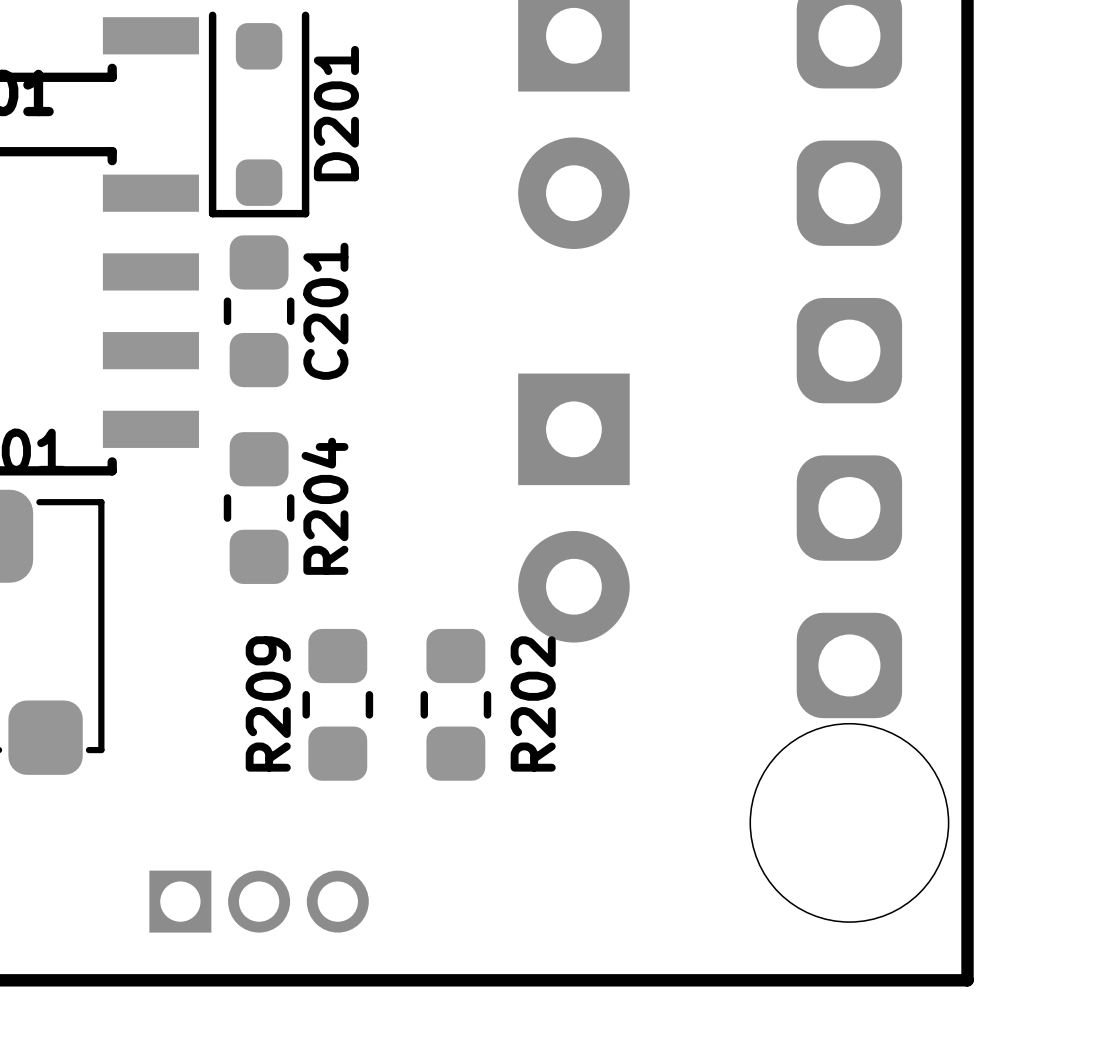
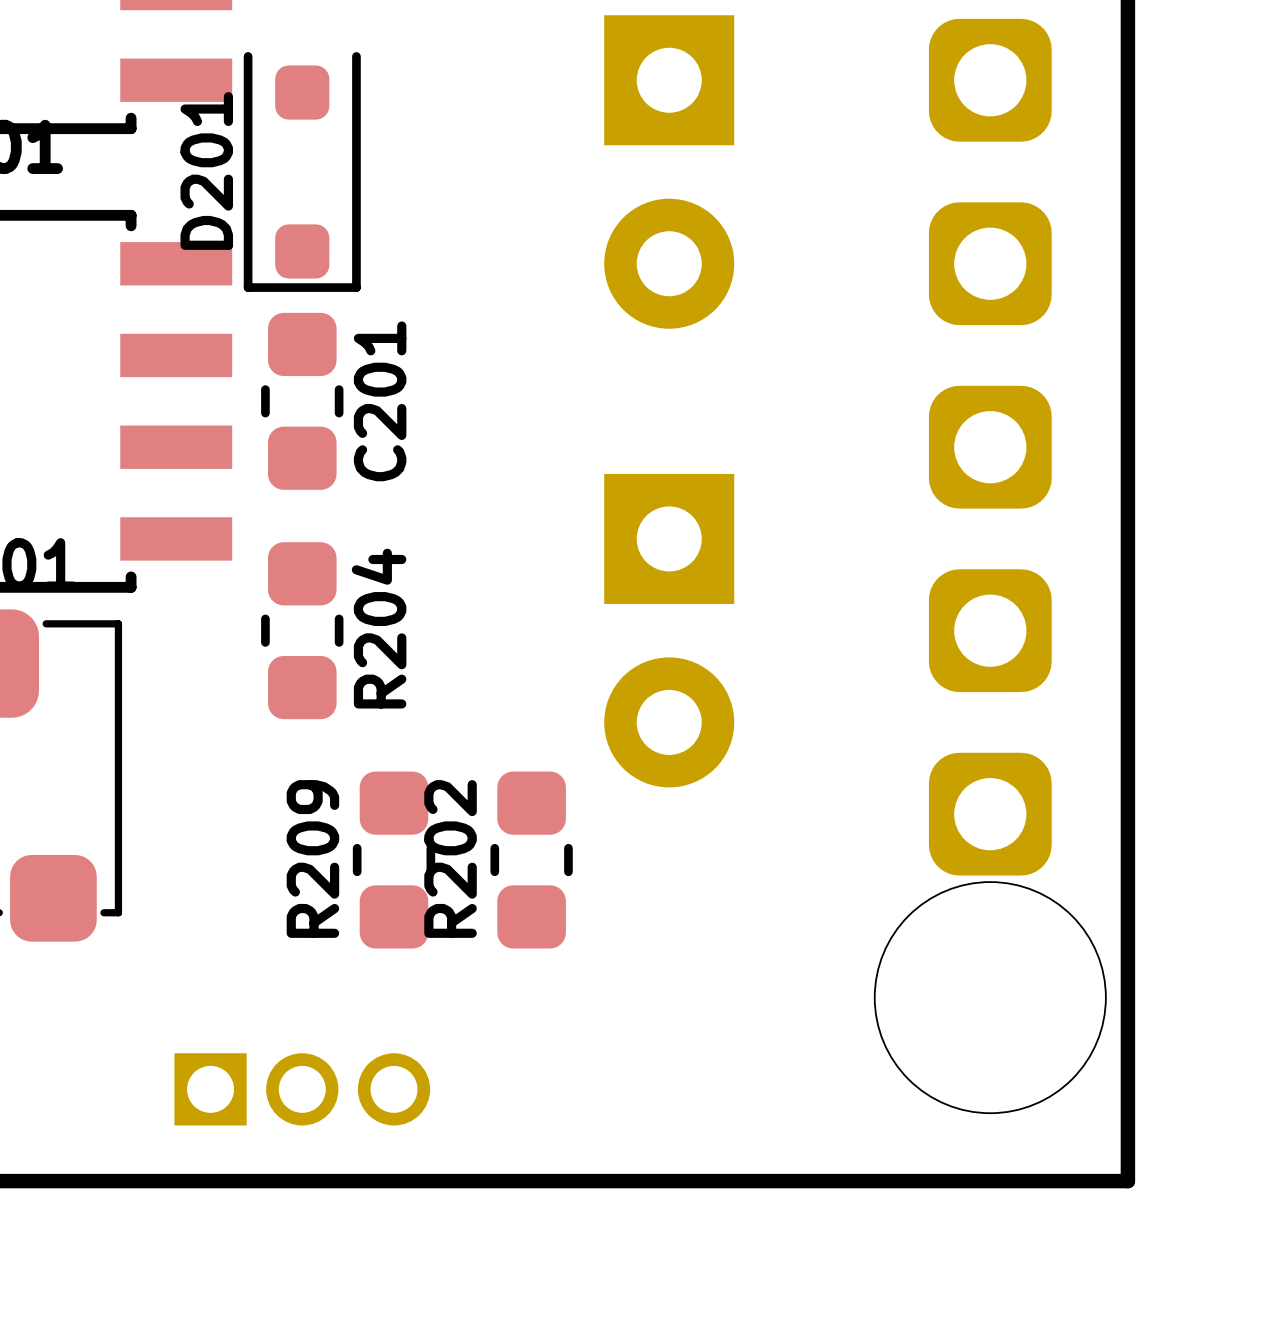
D201 name position: D201 (336, 113) -> D201 (206, 170)
R202 name position: R202 (533, 703) -> R202 (450, 858)

